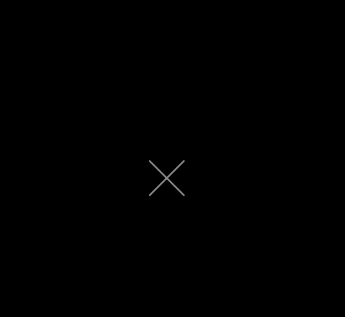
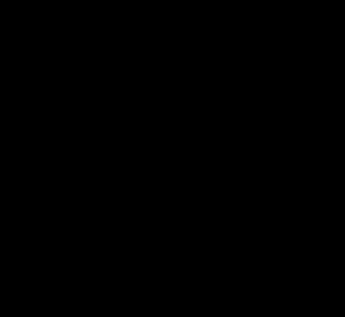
no-connect mark: (166, 178) -> none

